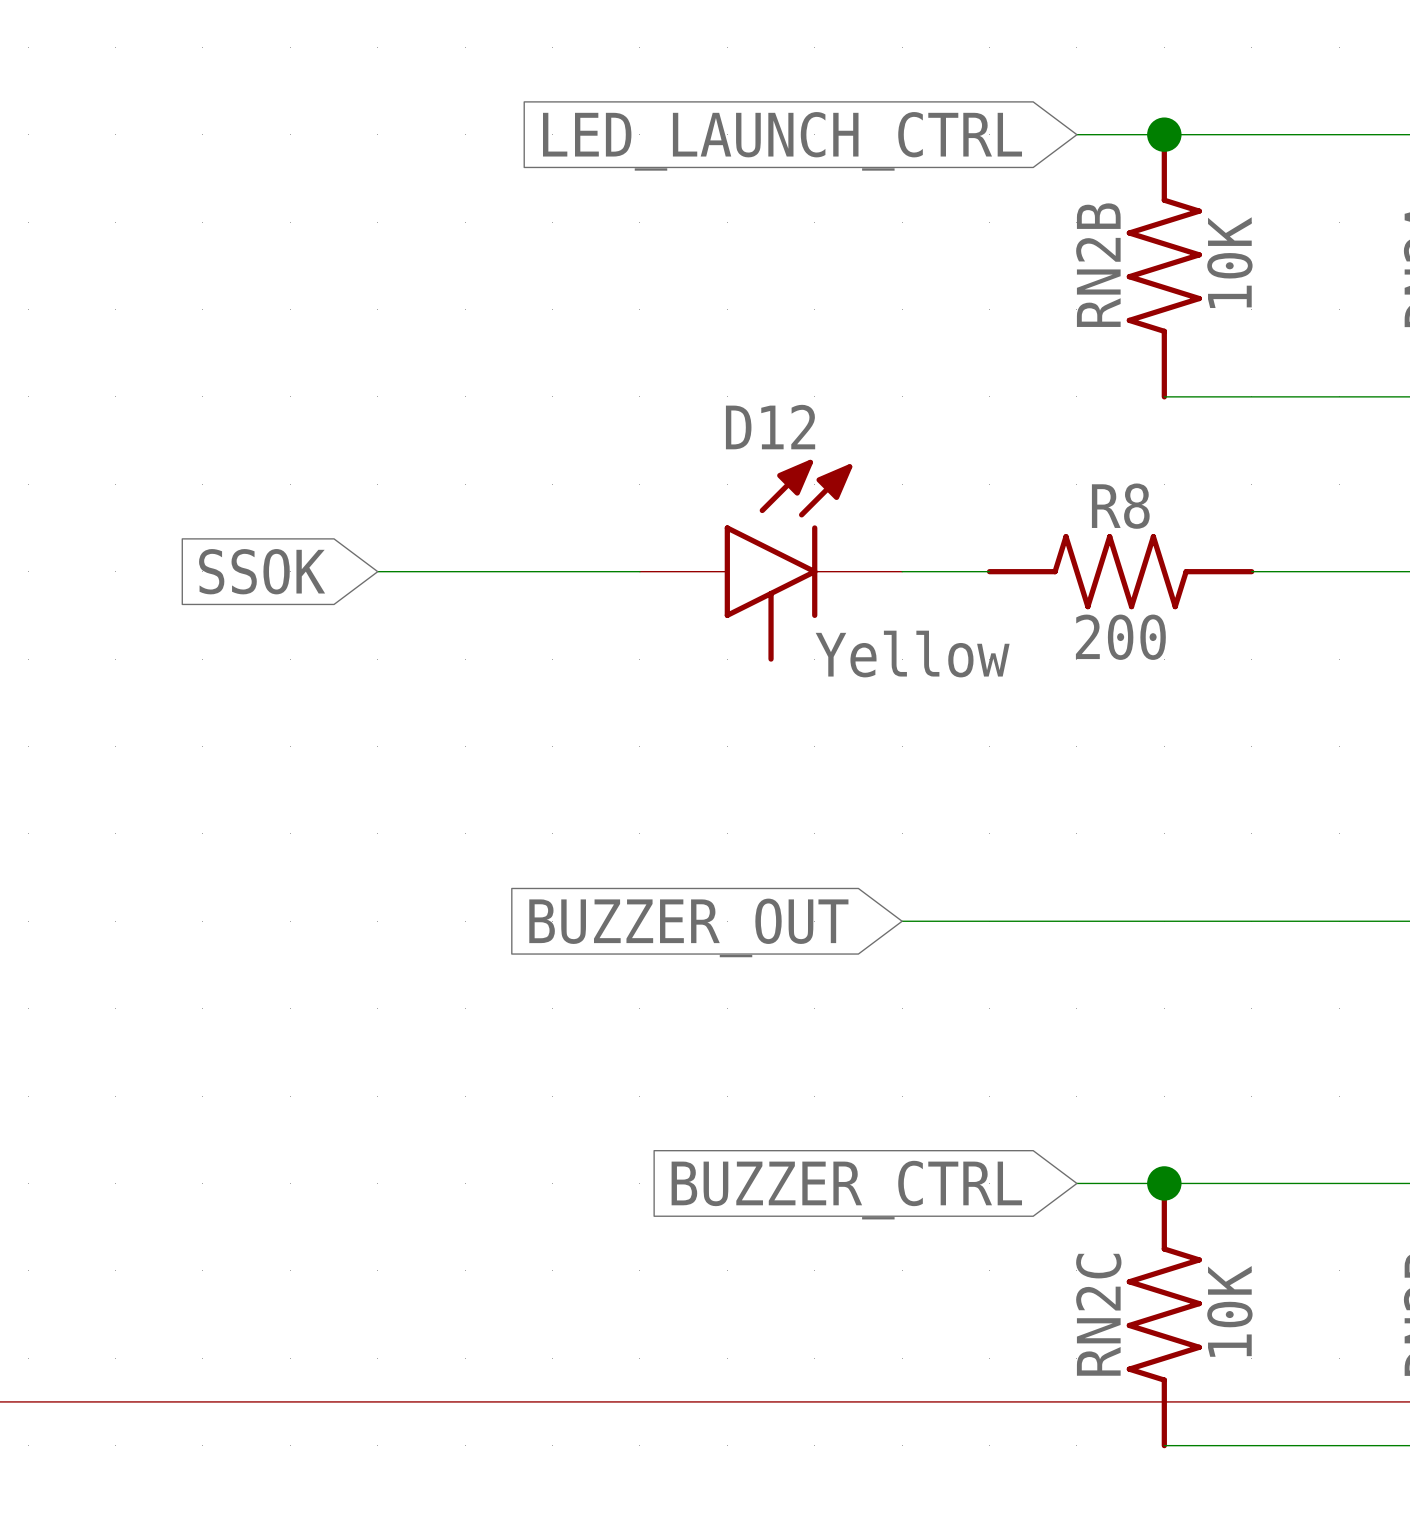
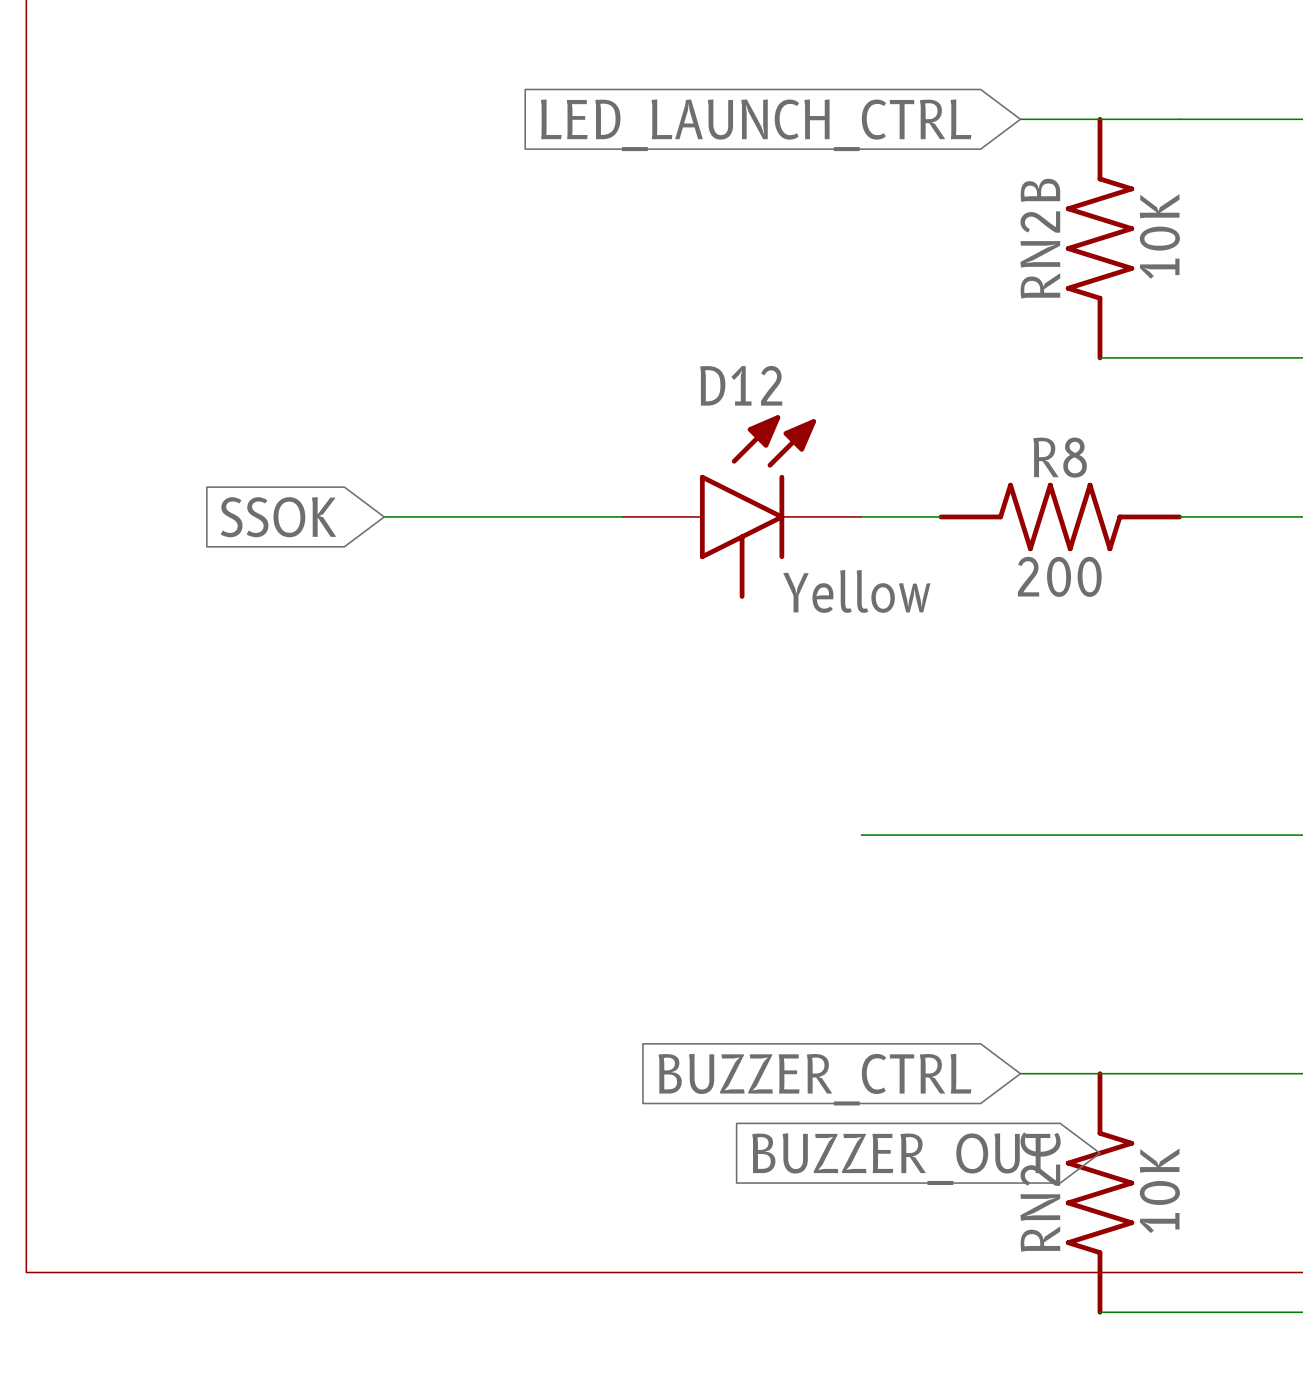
junction: (1164, 134) -> none
global label position: BUZZER_OUT (688, 927) -> BUZZER_OUT (901, 1159)
junction: (1164, 1183) -> none

